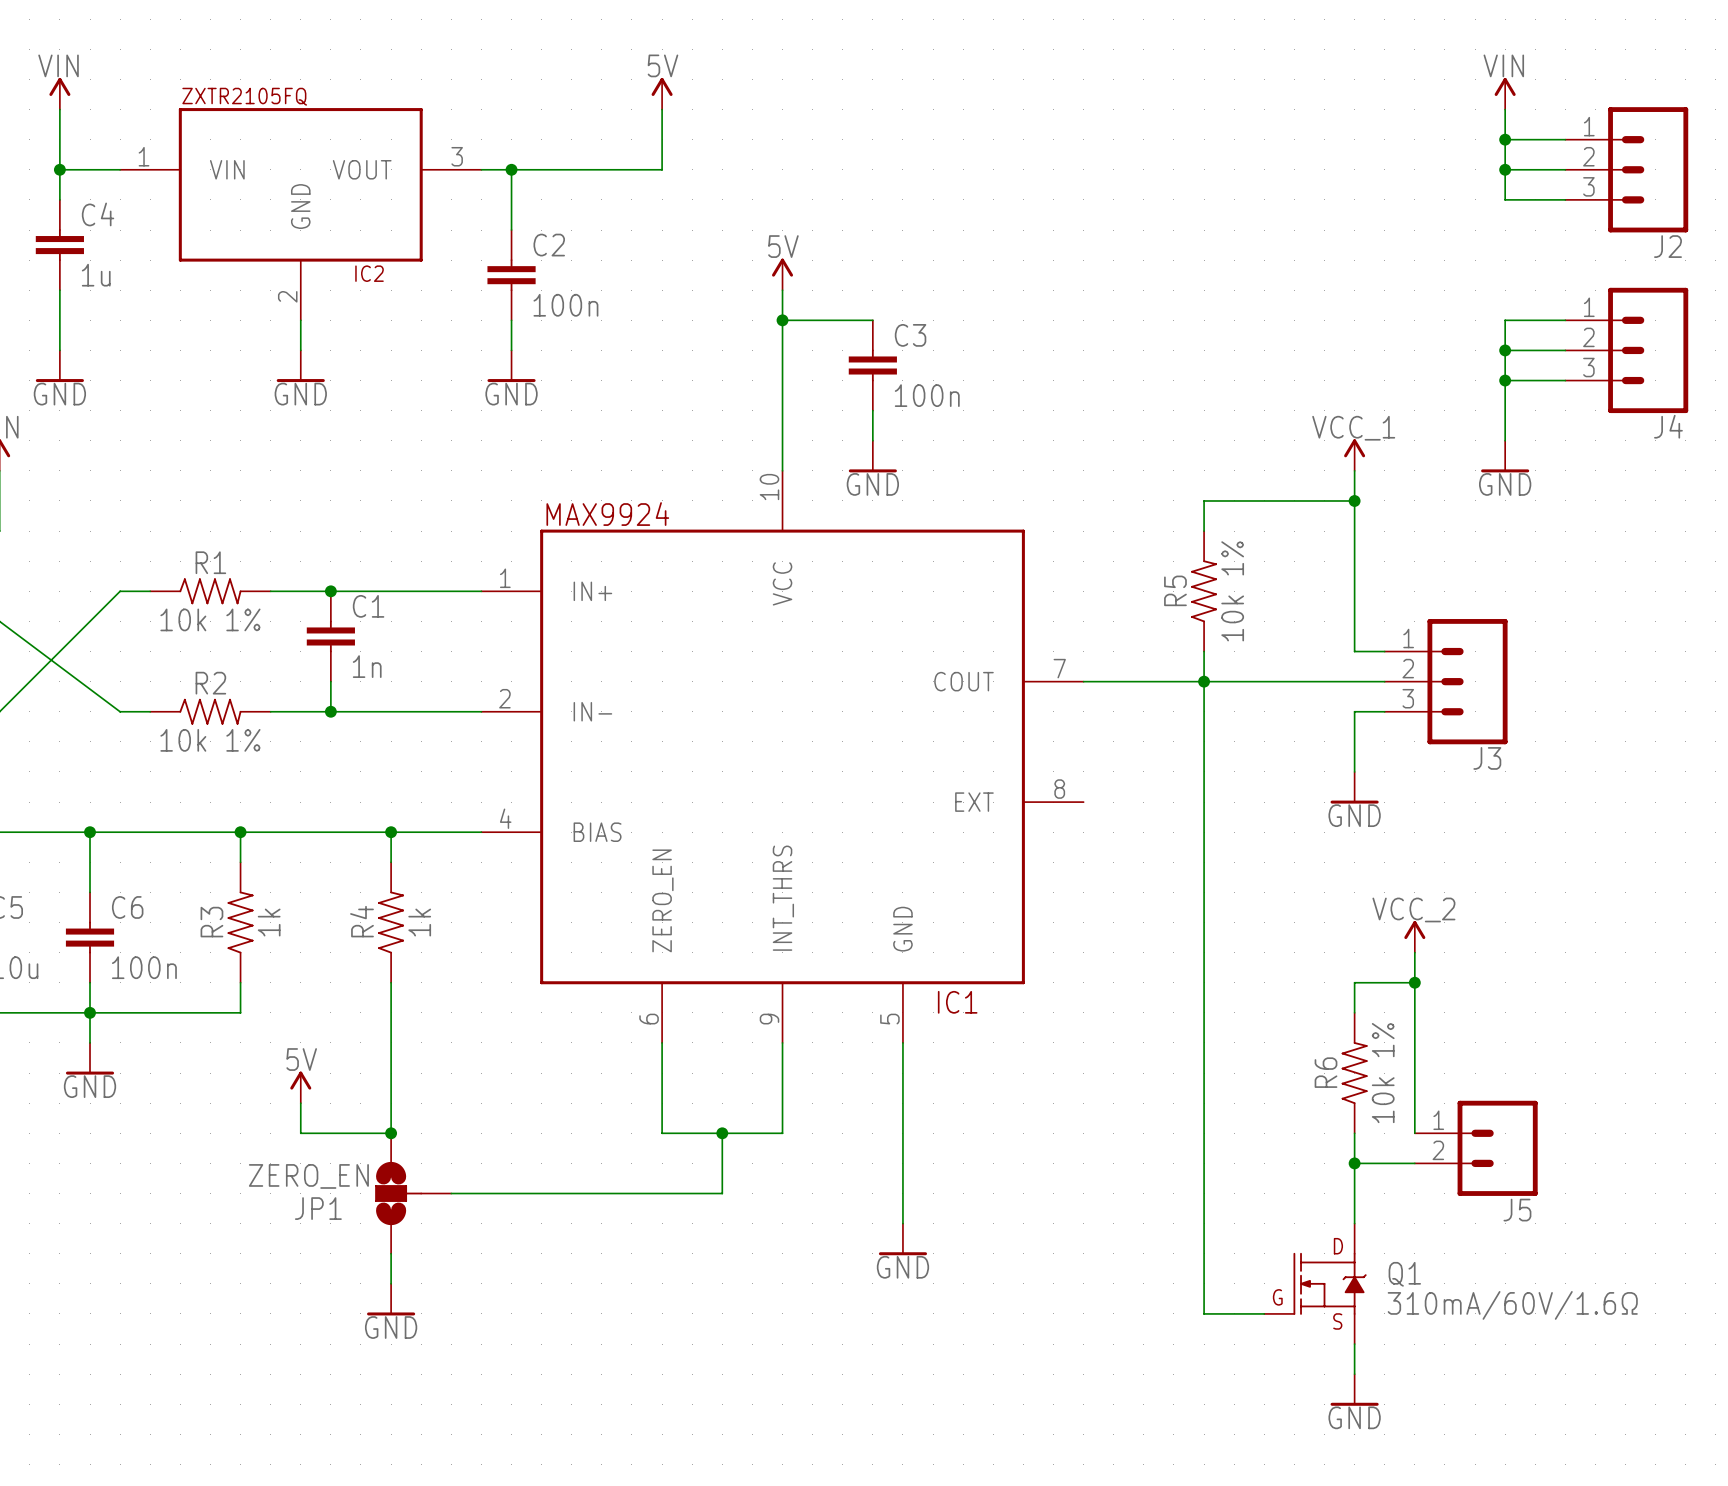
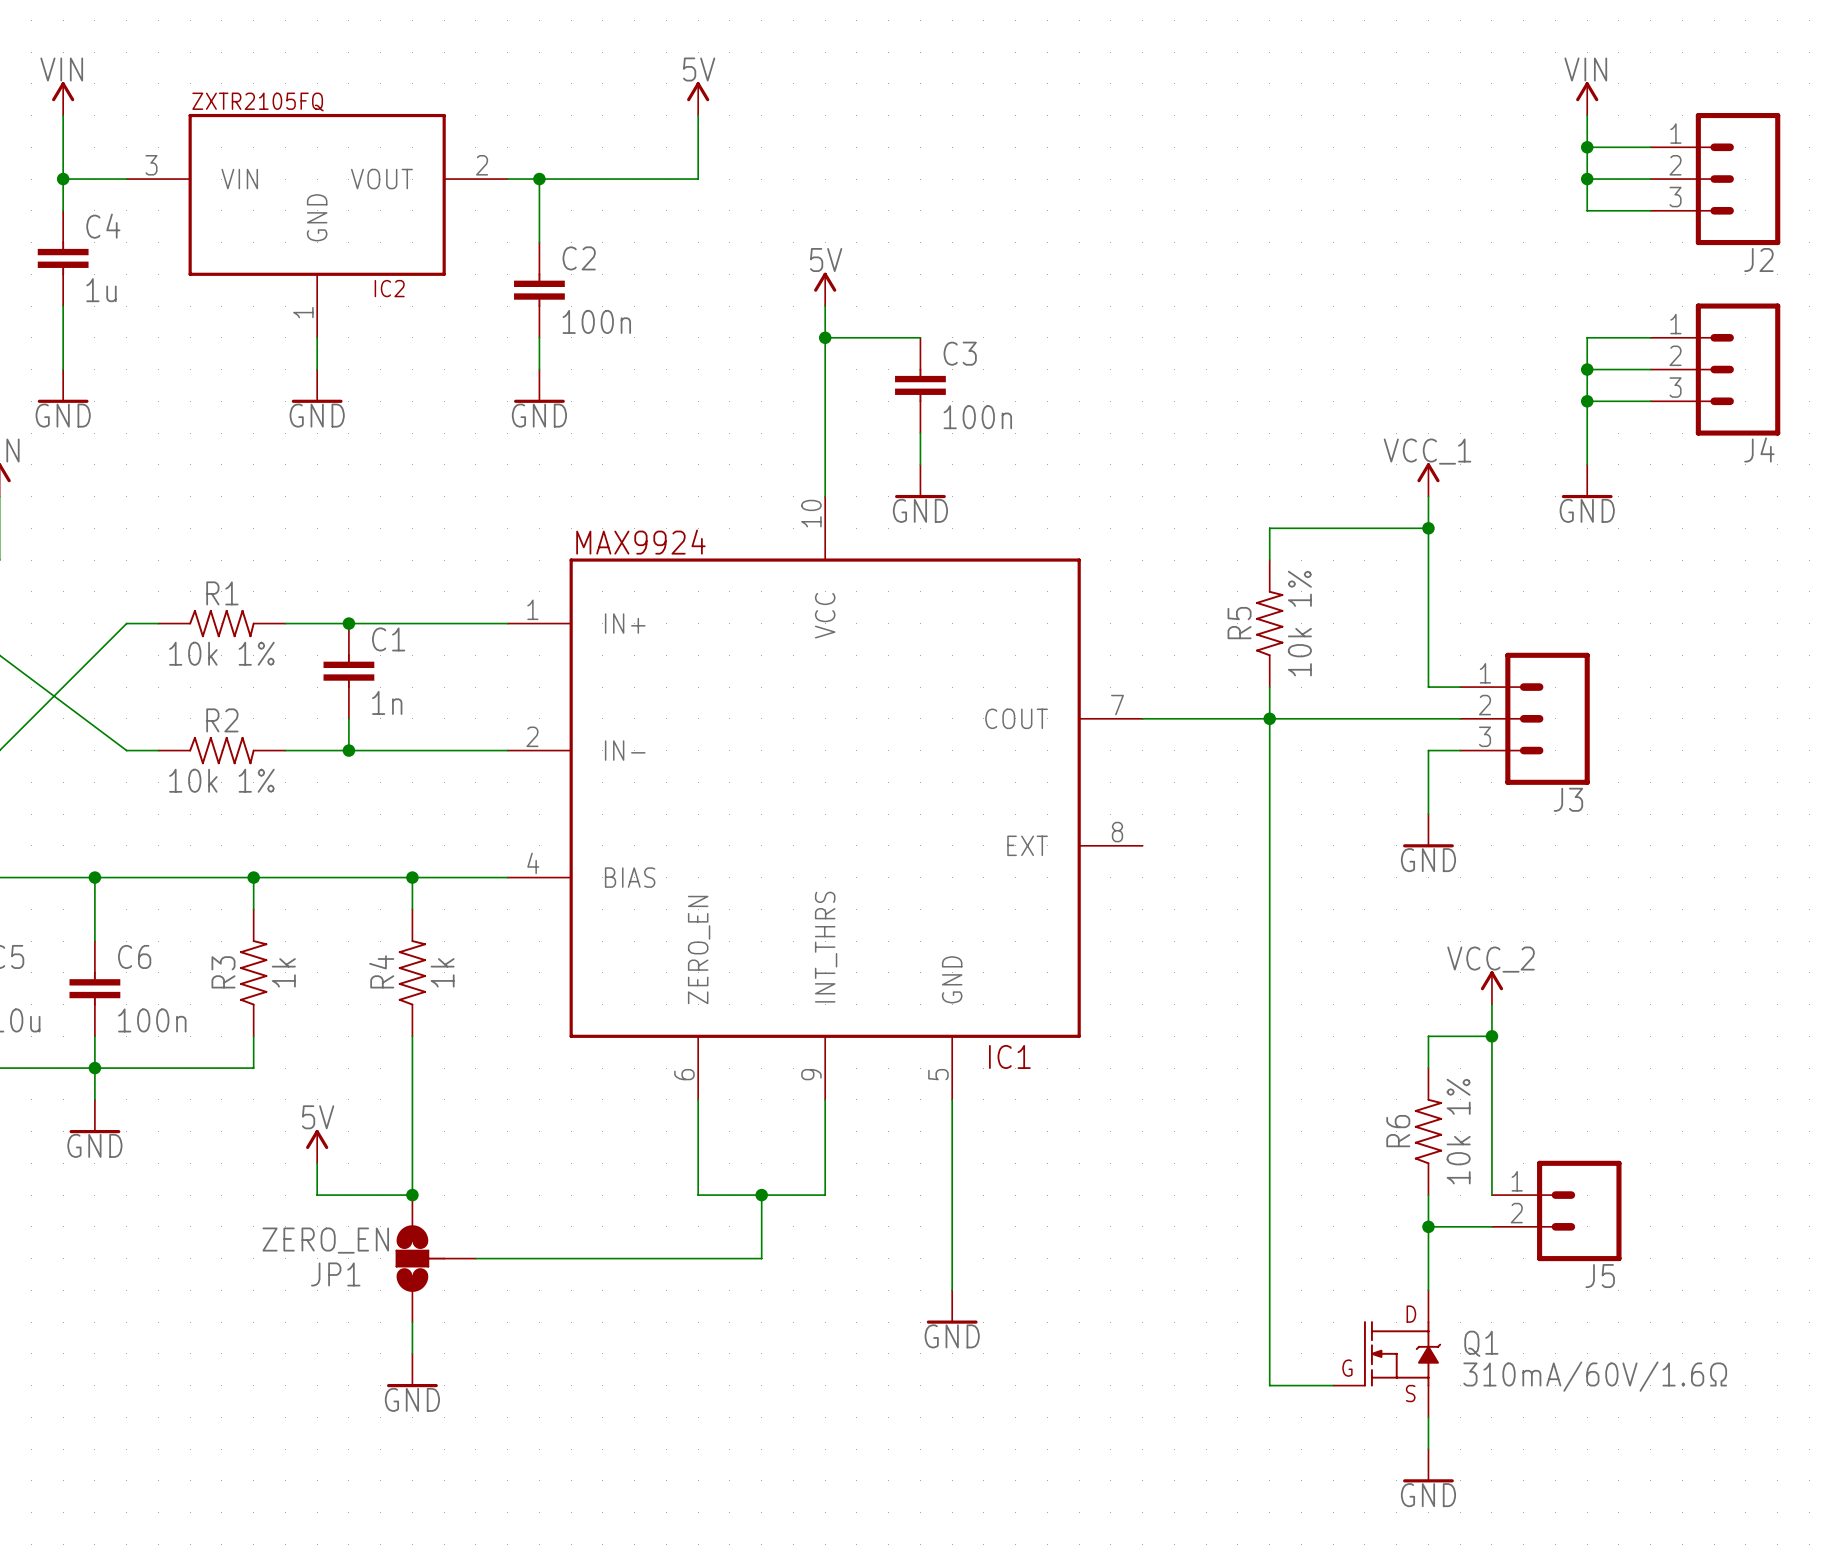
IC2 pin number: 1 (144, 156) -> 3 (151, 165)
IC2 pin number: 3 (457, 156) -> 2 (482, 165)
IC2 pin number: 2 (287, 296) -> 1 (303, 312)

